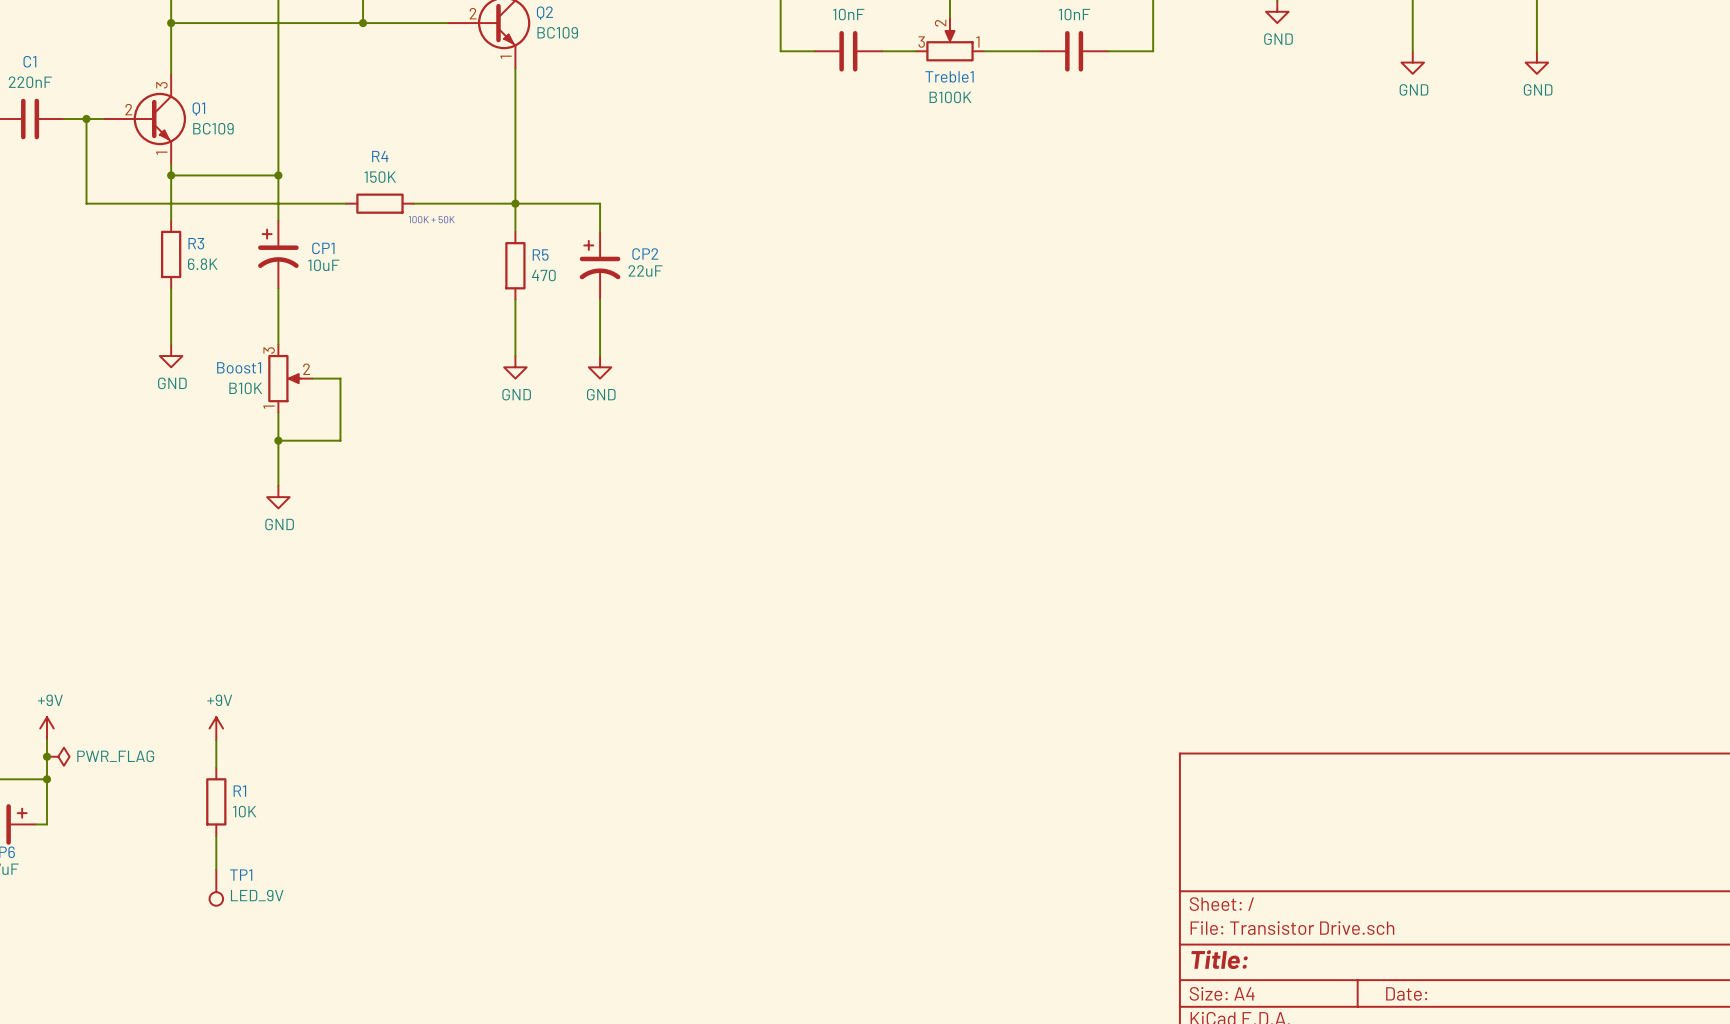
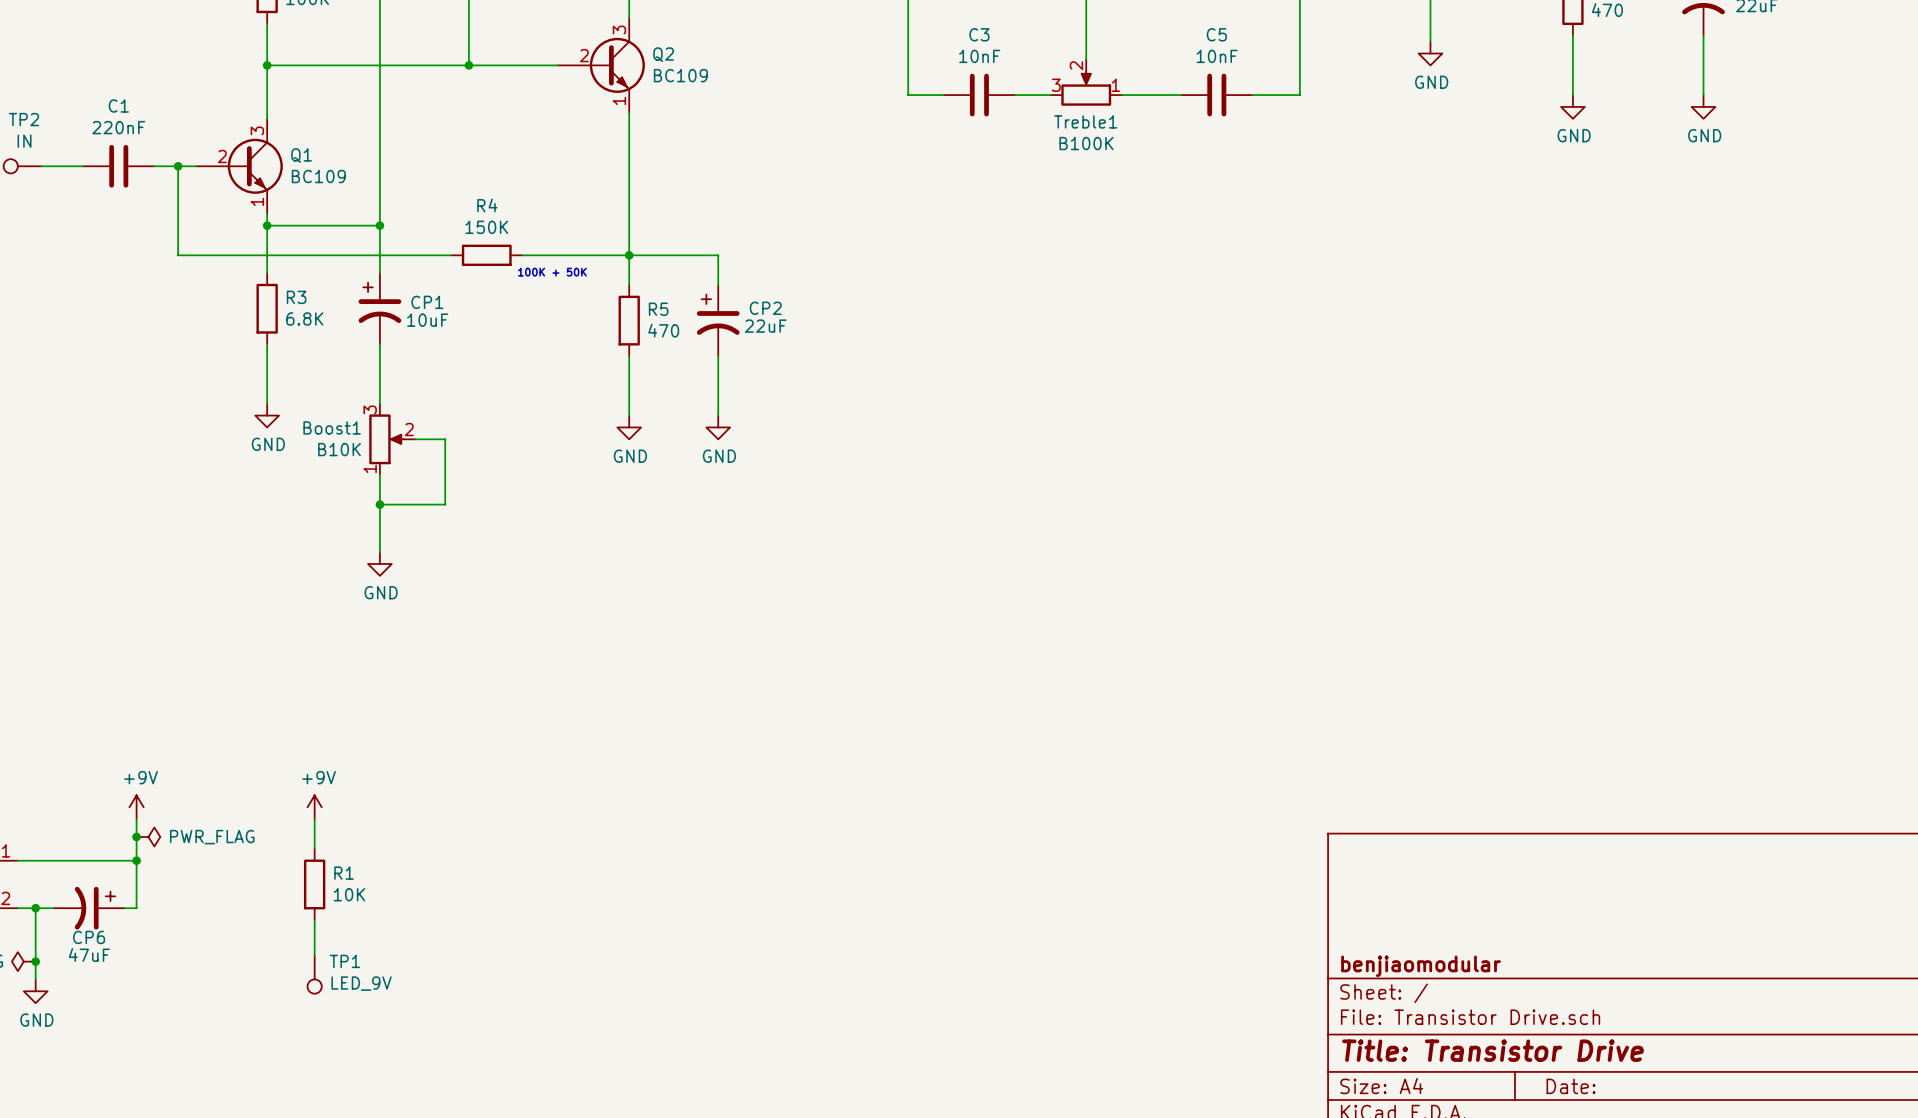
title block: none -> benjiaomodular (1421, 966)
title block: Title: (1219, 959) -> Title: Transistor Drive (1492, 1050)

